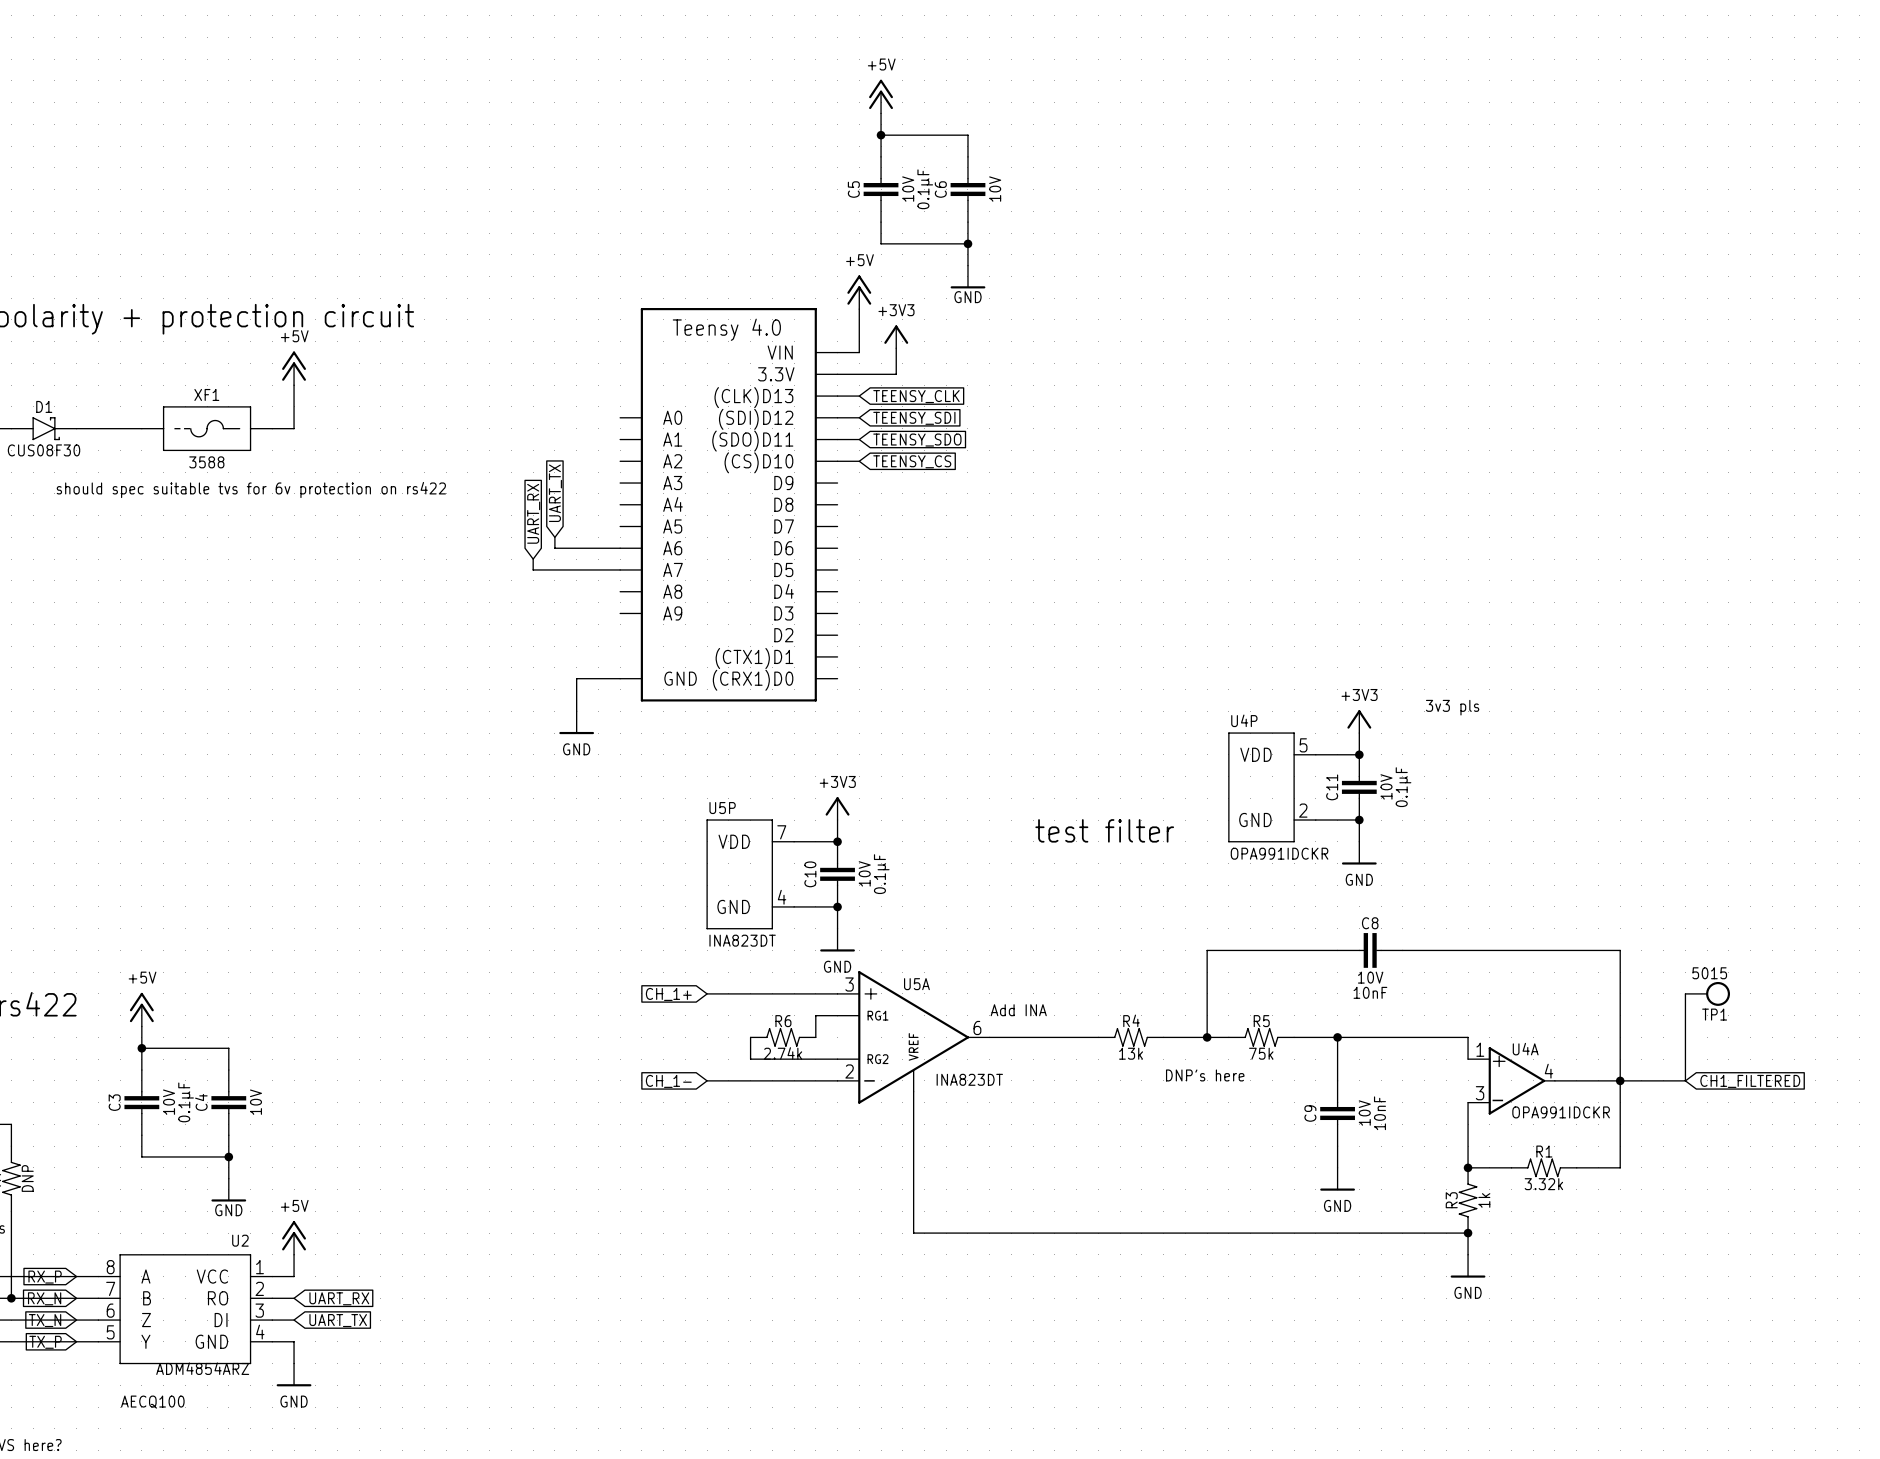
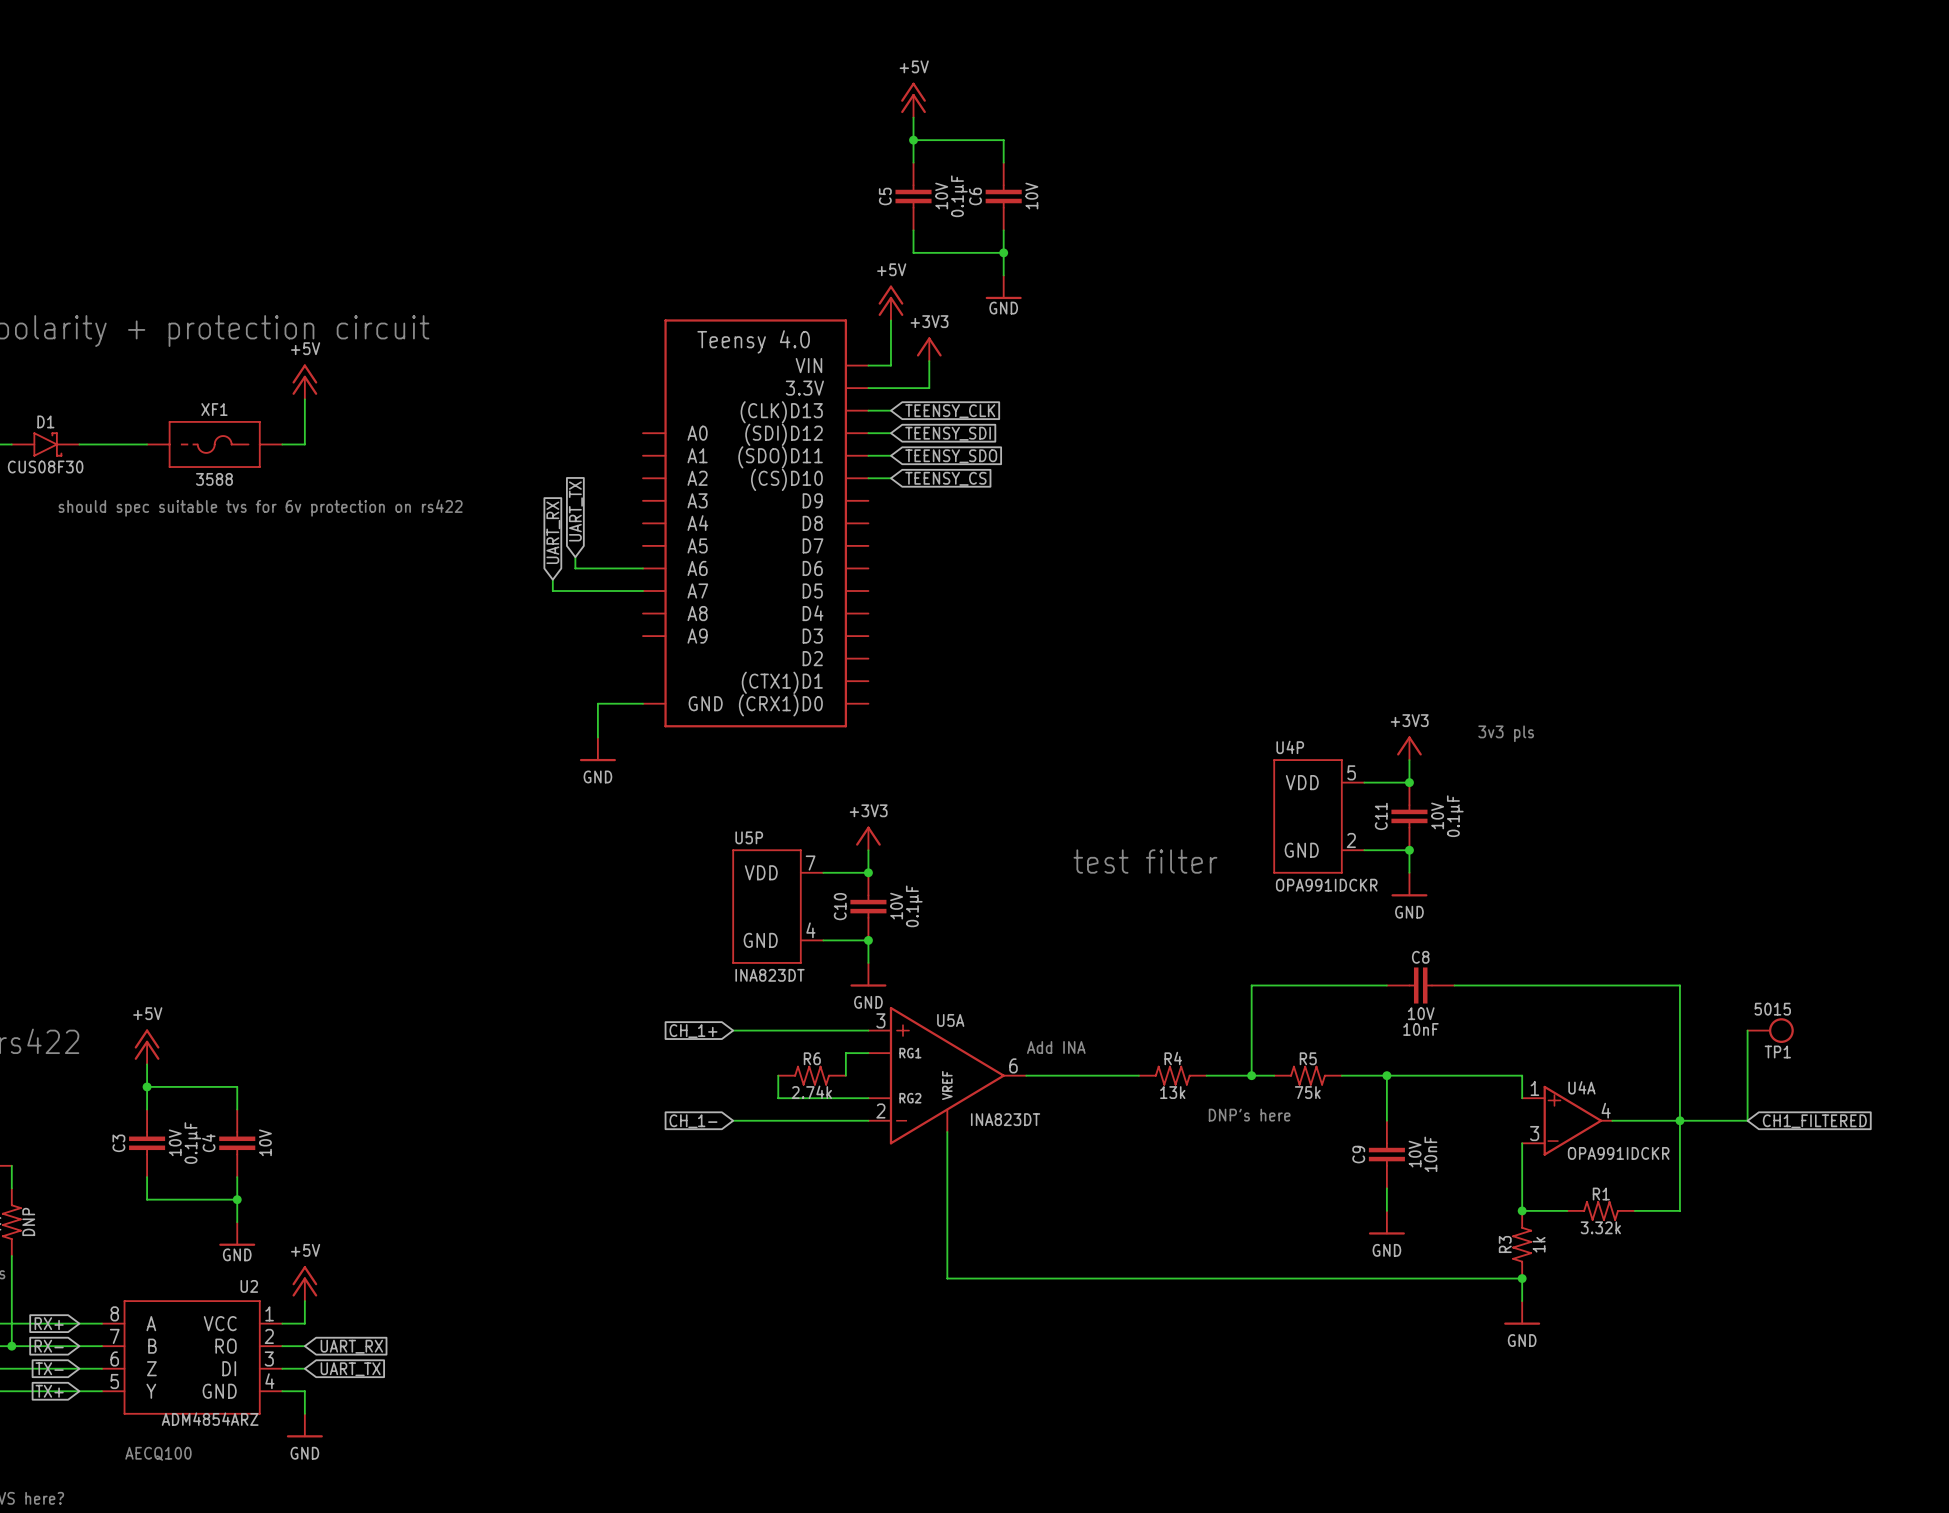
global label: RX_P (45, 1277) -> RX+ (49, 1323)
global label: RX_N (44, 1298) -> RX- (49, 1346)
global label: TX_N (45, 1320) -> TX- (49, 1368)
global label: TX_P (45, 1342) -> TX+ (49, 1391)

